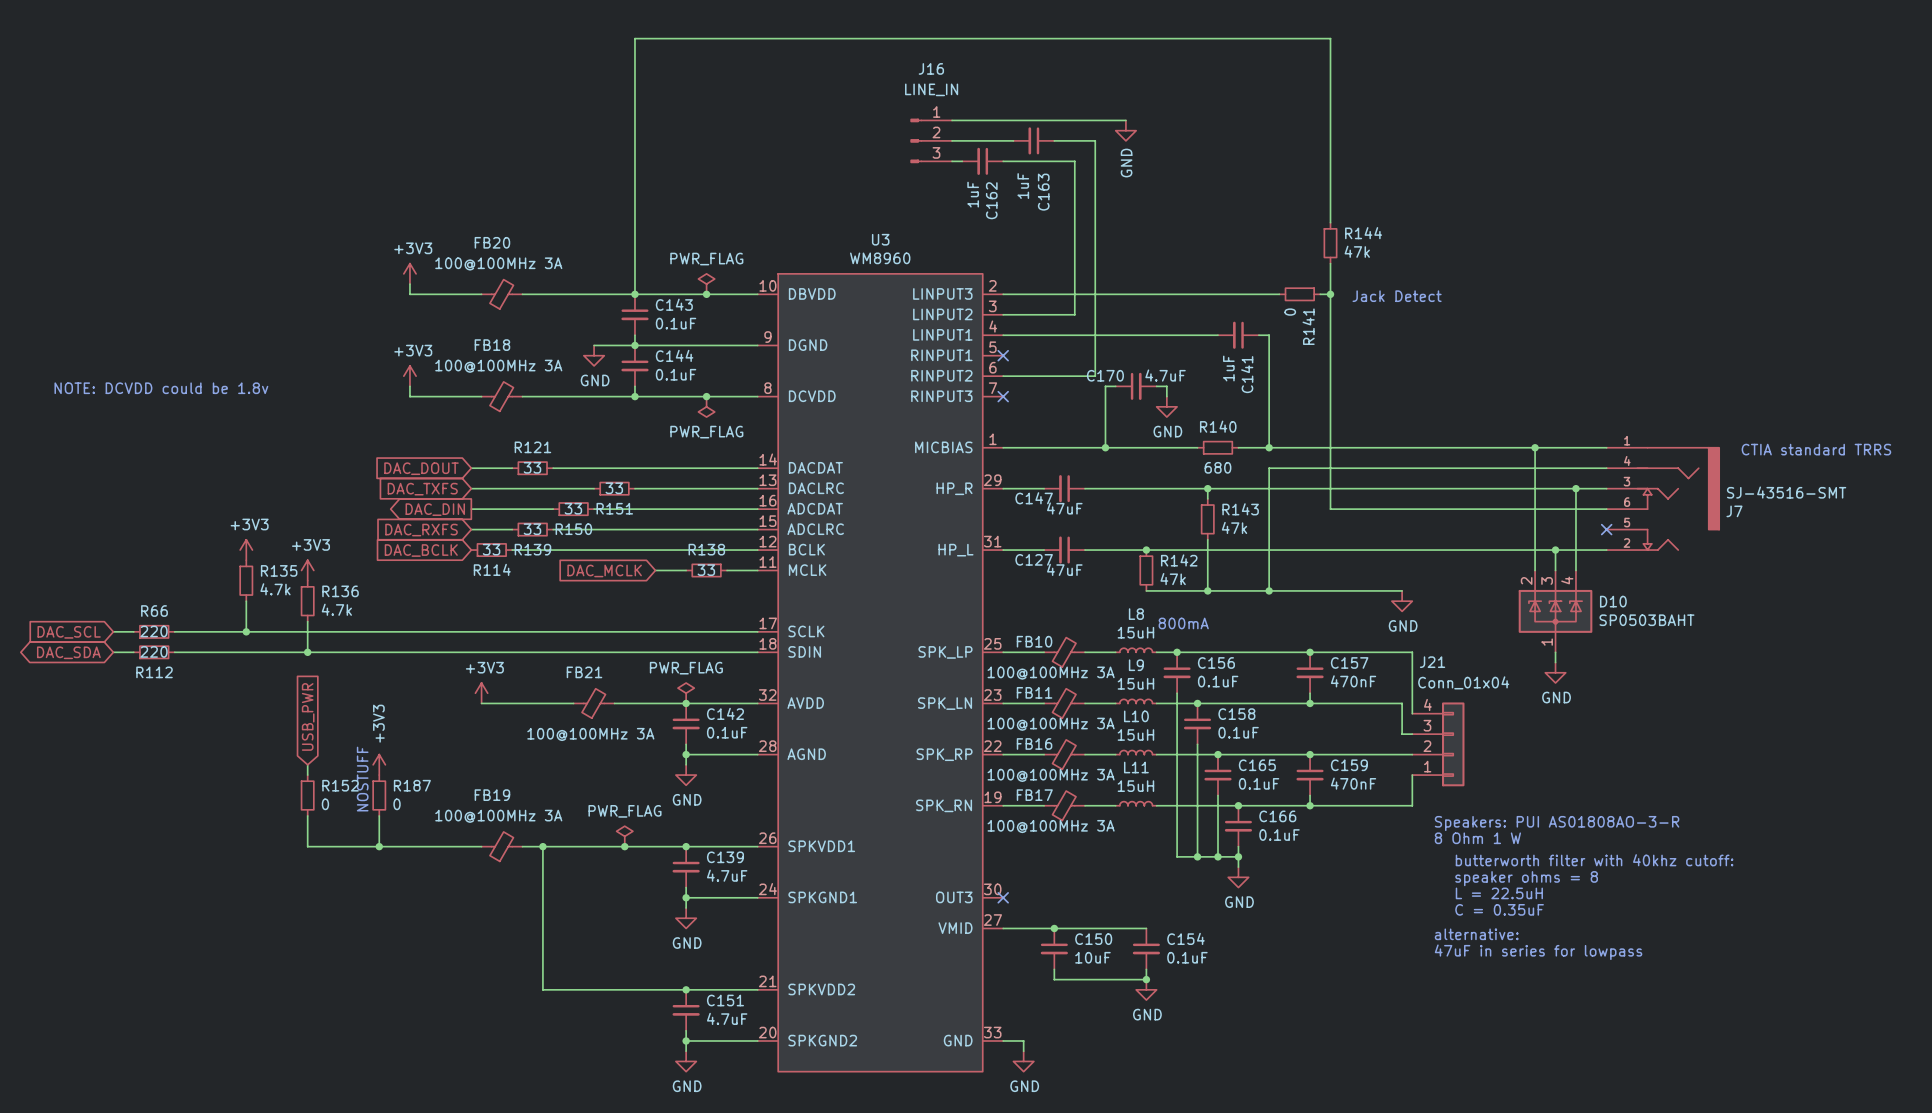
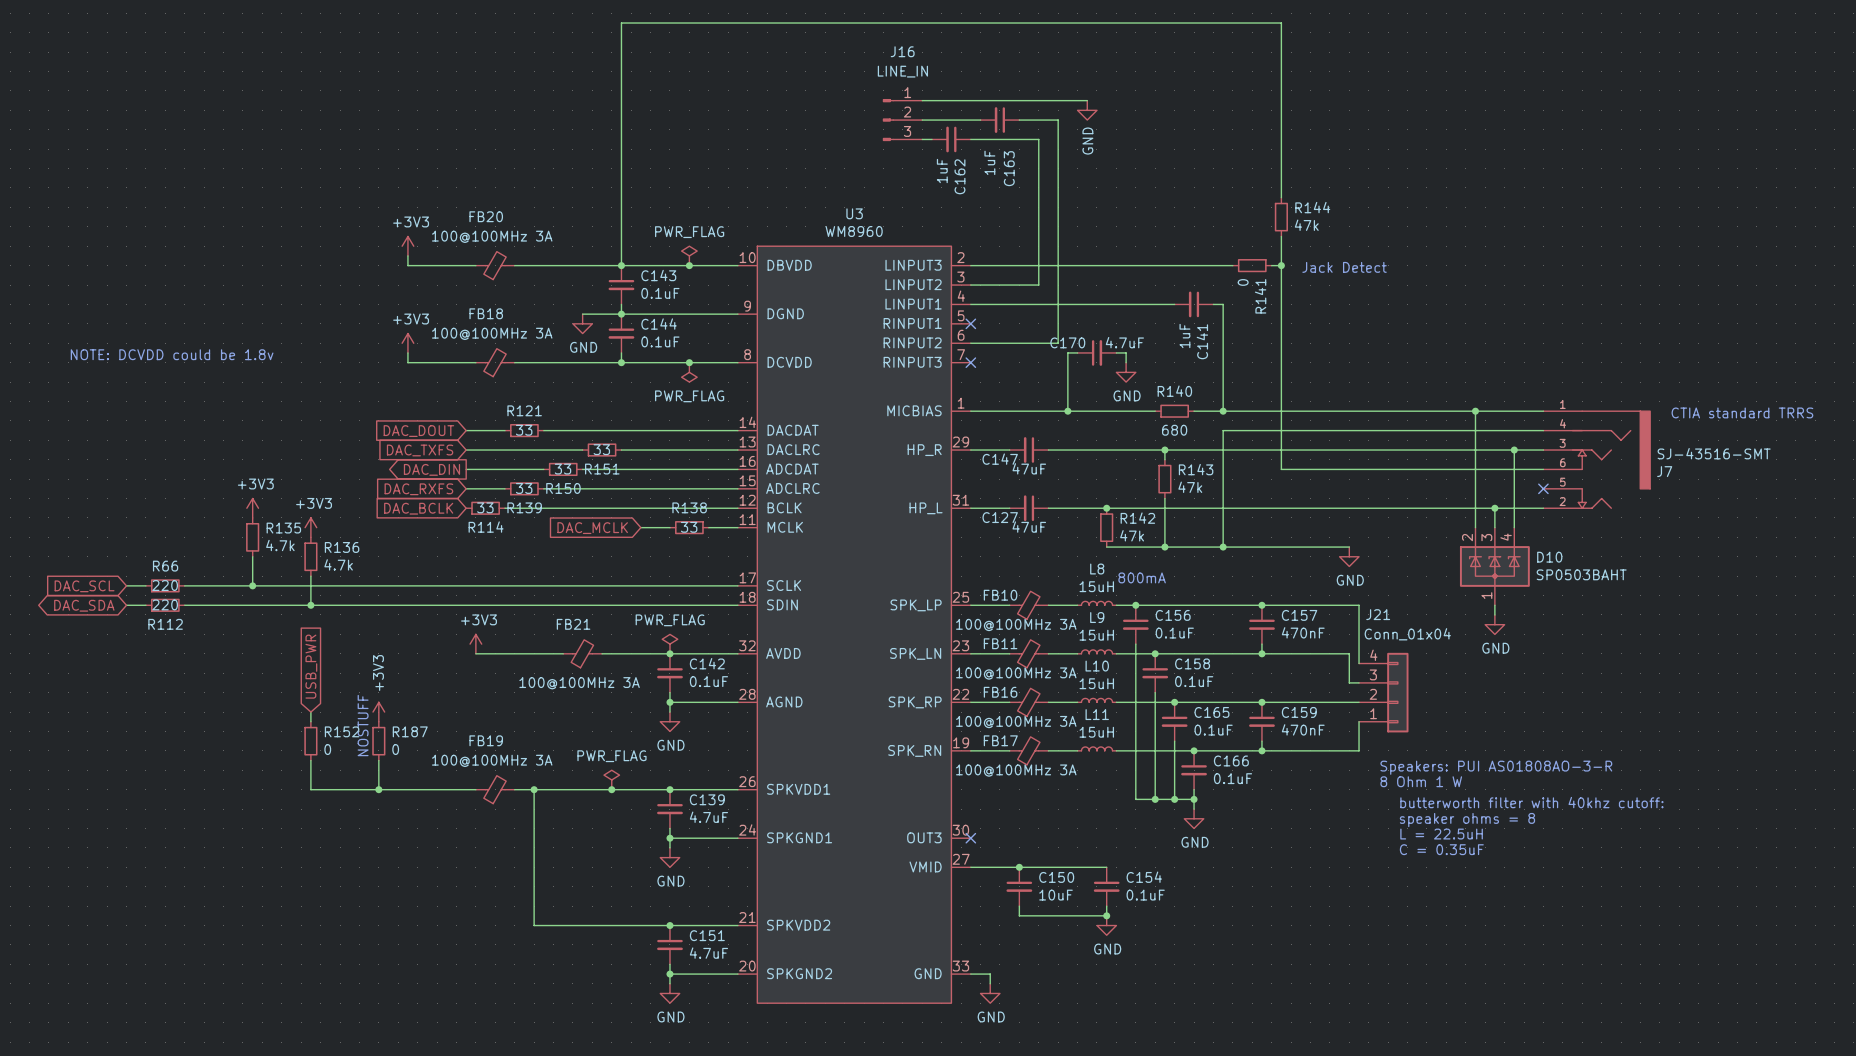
text: alternative: (1476, 934) -> none
text: 47uF in series for lowpass (1538, 952) -> none

